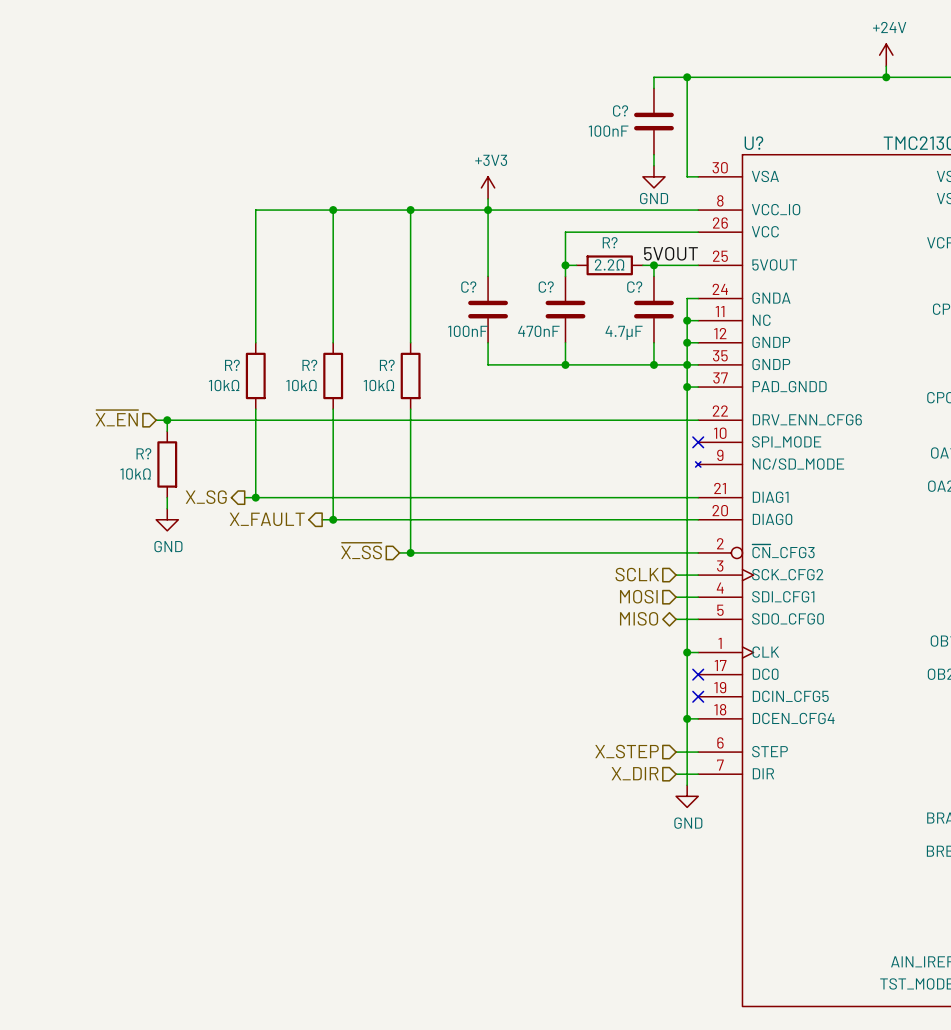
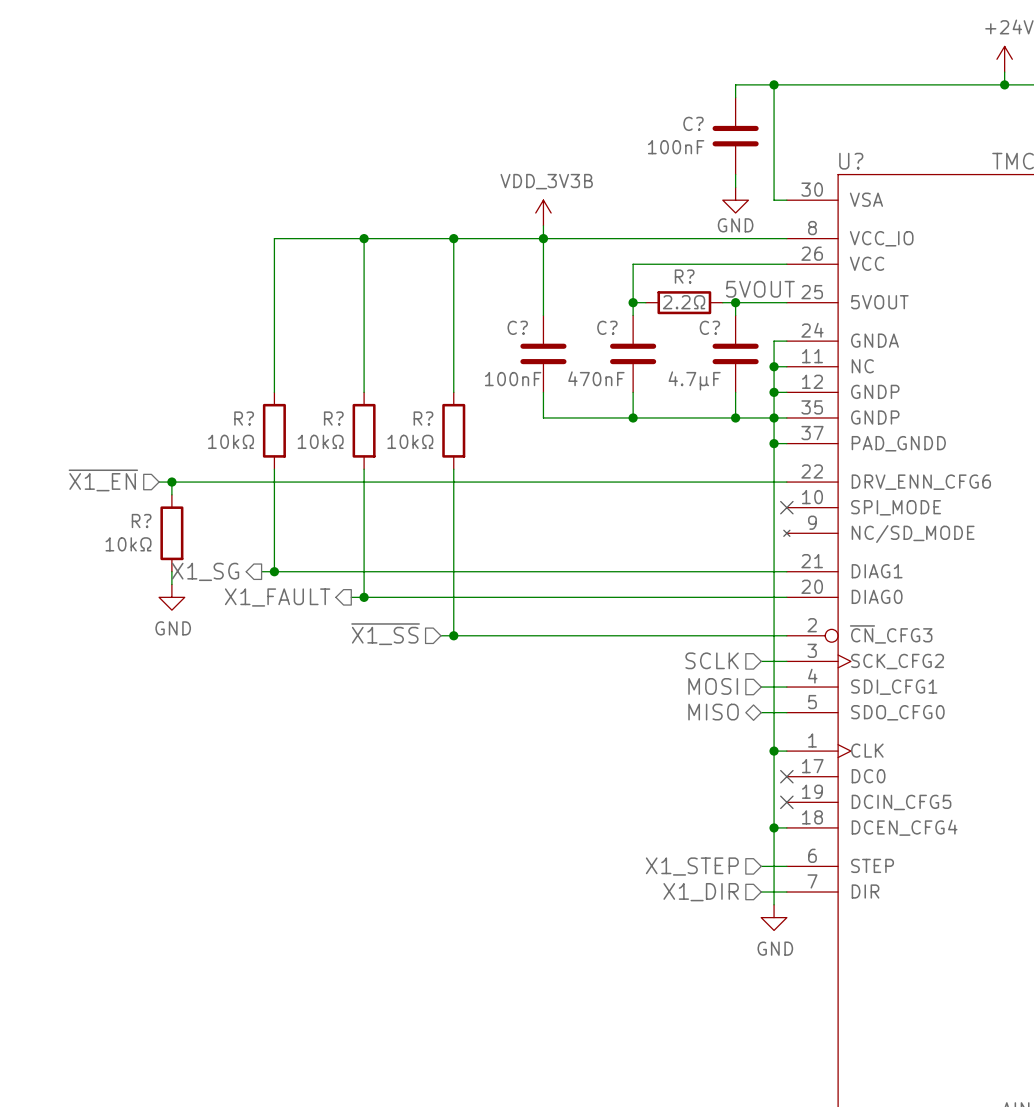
power symbol: +3V3 (488, 187) -> VDD_3V3B (543, 213)
hierarchical label: ~{X_EN} (116, 418) -> ~{X1_EN} (103, 480)
hierarchical label: X_SG (206, 497) -> X1_SG (205, 571)
hierarchical label: X_FAULT (267, 519) -> X1_FAULT (277, 597)
hierarchical label: ~{X_SS} (361, 551) -> ~{X1_SS} (385, 634)
hierarchical label: X_STEP (627, 751) -> X1_STEP (692, 866)
hierarchical label: X_DIR (635, 773) -> X1_DIR (701, 892)

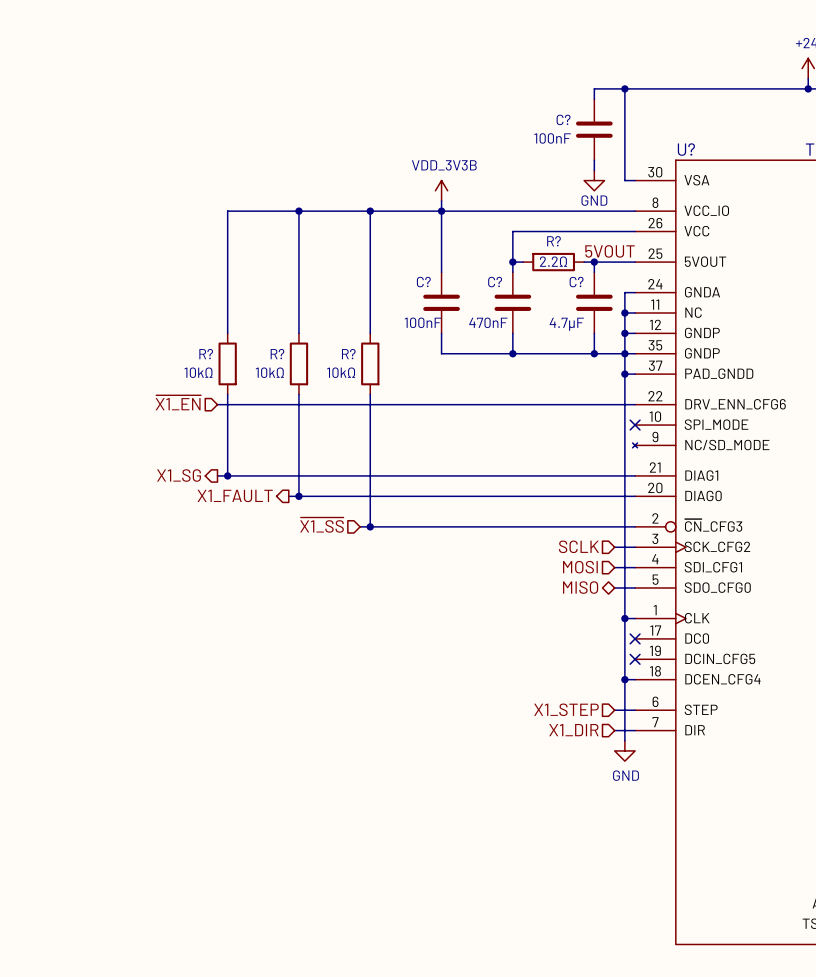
hierarchical label position: ~{X1_EN} (103, 480) -> ~{X1_EN} (178, 402)
wire: (159, 482) (261, 482) -> none
wire: (171, 482) (171, 494) -> none
junction: (171, 482) -> none
R?: 10kΩ (171, 533) -> none
wire: (171, 571) (171, 584) -> none
power symbol: GND (171, 597) -> none

